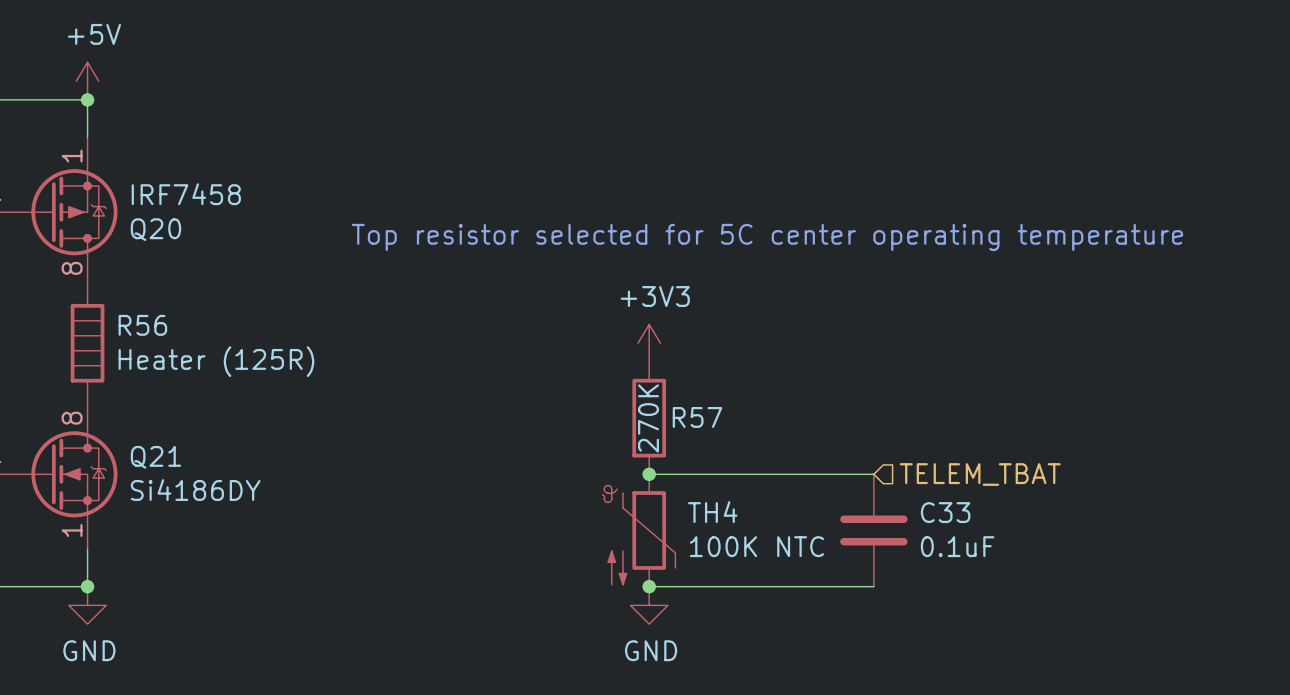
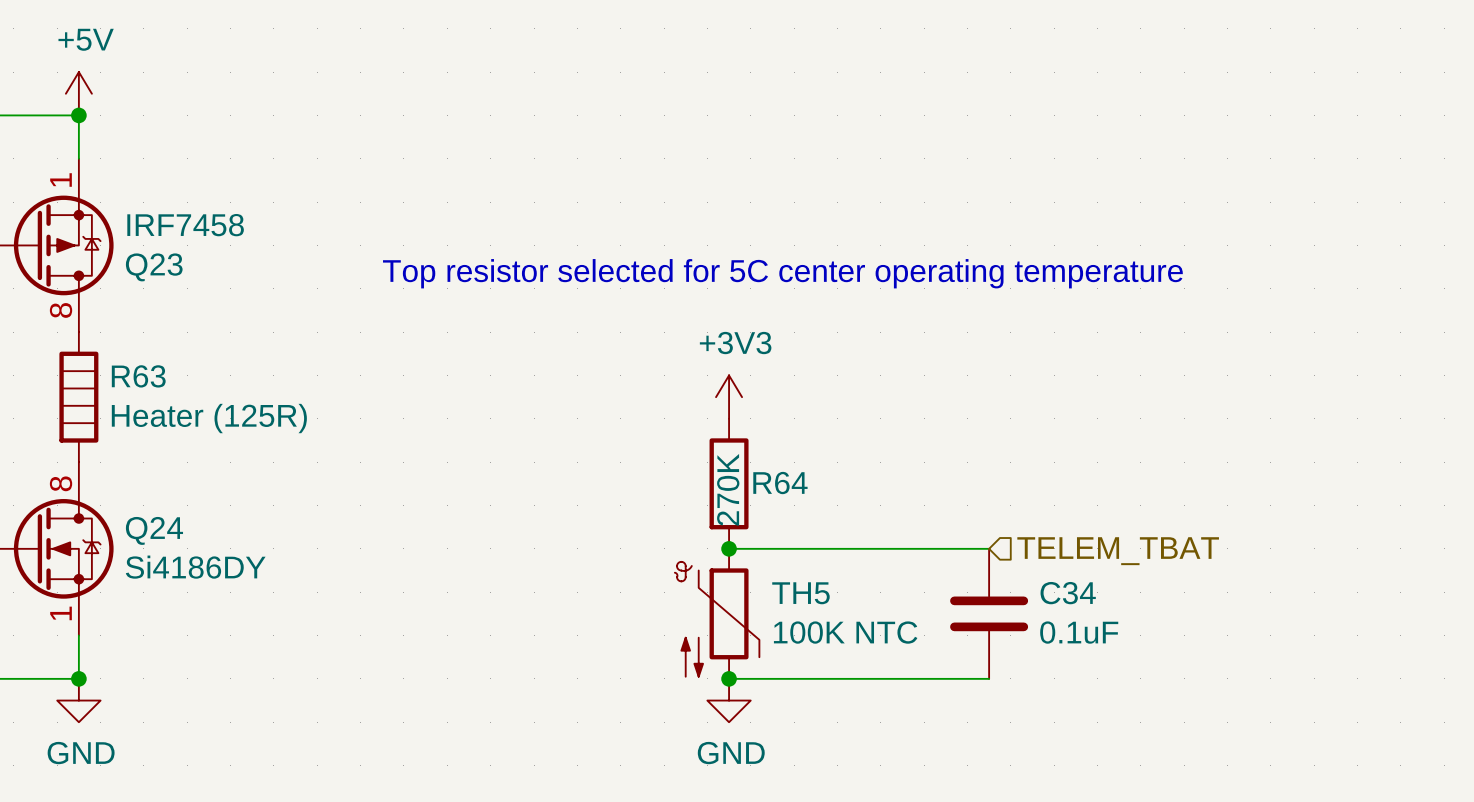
Q20 name: Q20 (155, 229) -> Q23 (154, 267)
R56 name: R56 (142, 325) -> R63 (138, 376)
R57 name: R57 (697, 417) -> R64 (780, 483)
Q21 name: Q21 (155, 457) -> Q24 (154, 530)
TH4 name: TH4 (712, 512) -> TH5 (800, 593)
C33 name: C33 (945, 512) -> C34 (1068, 593)

